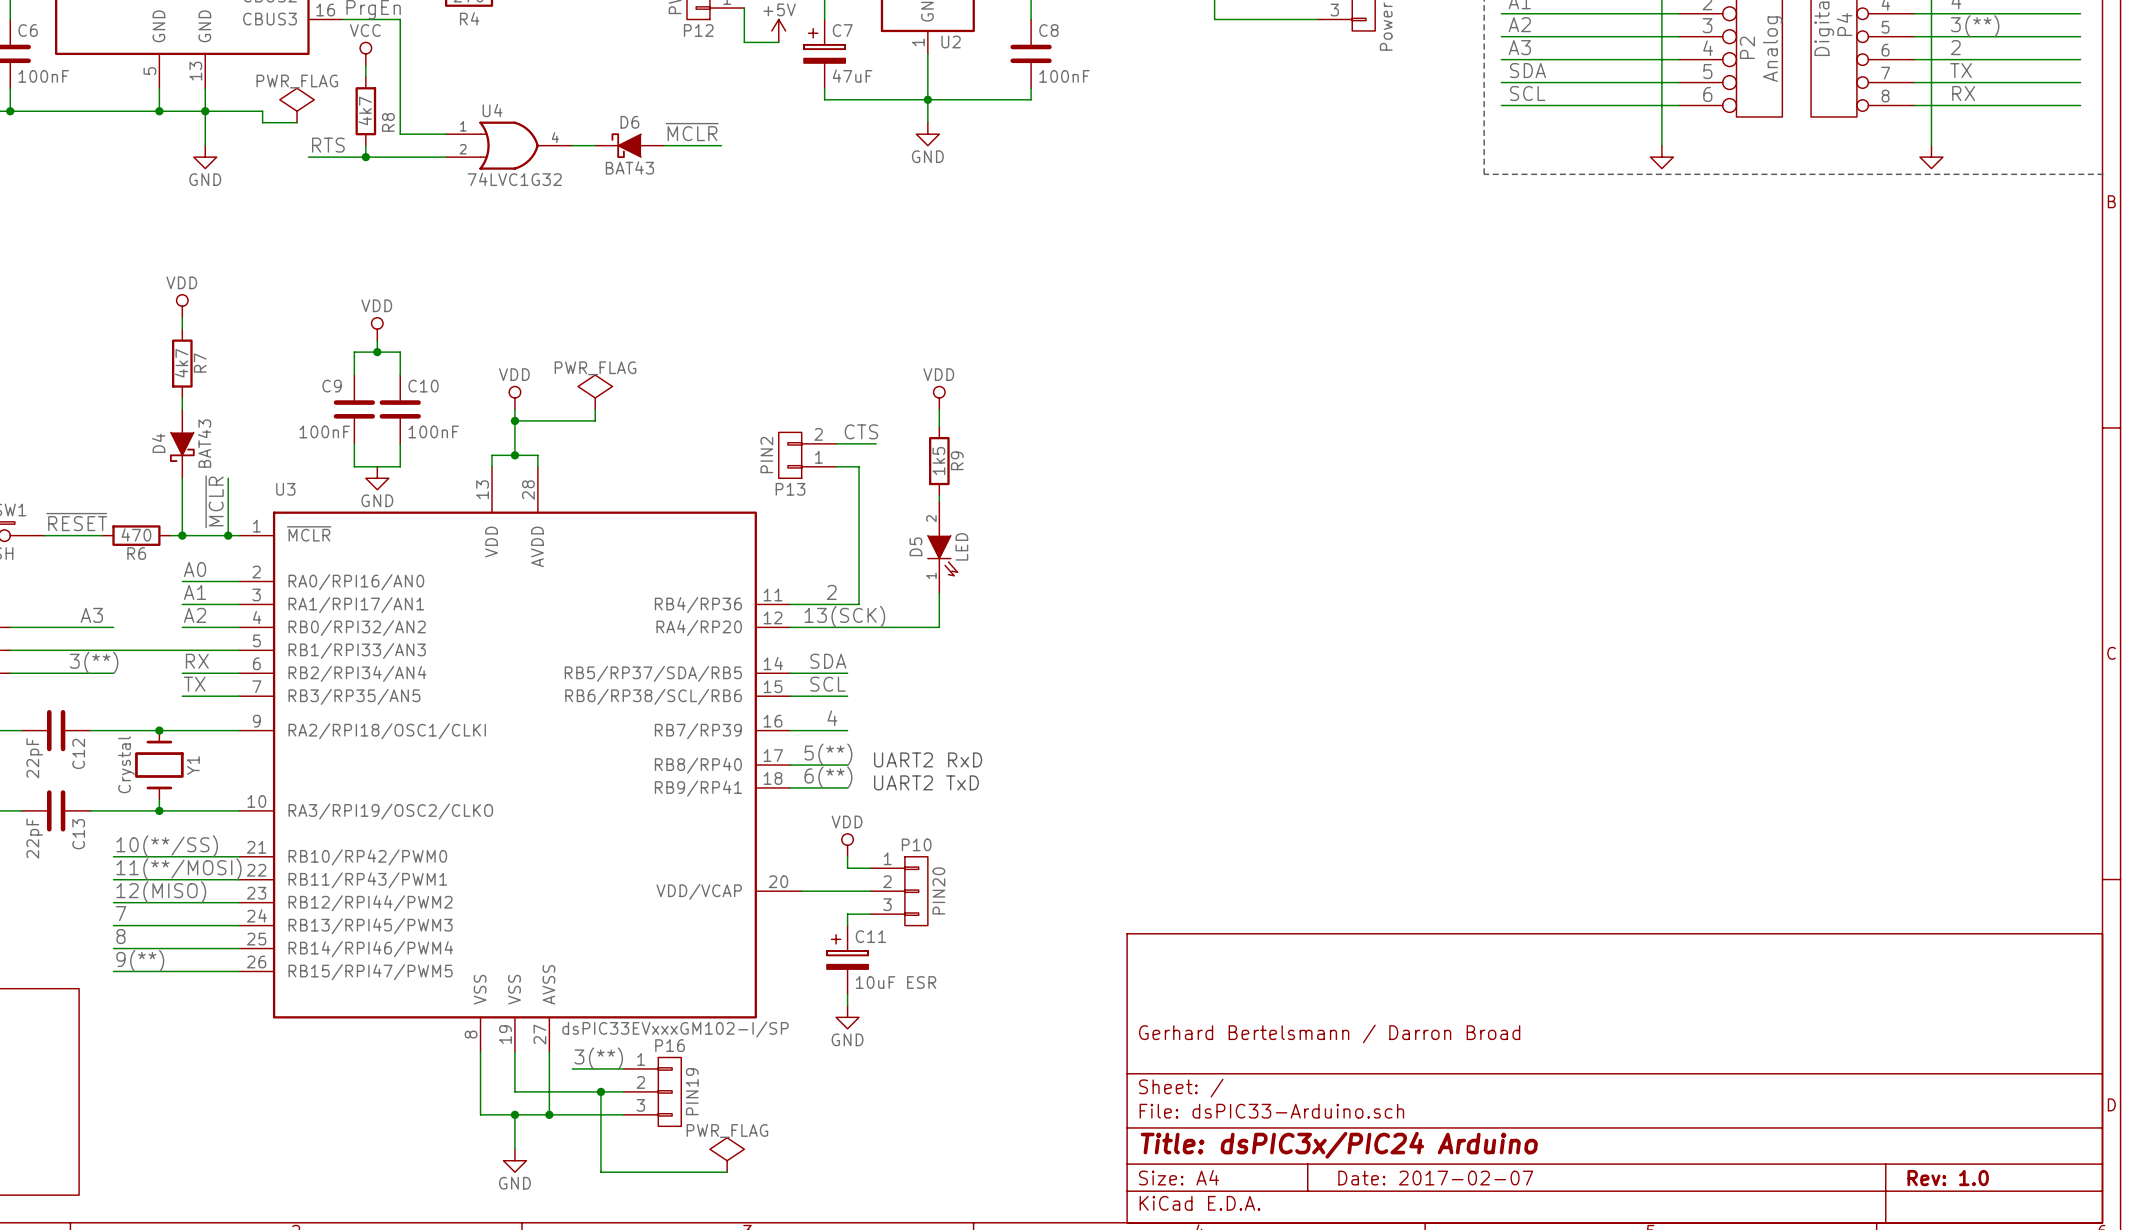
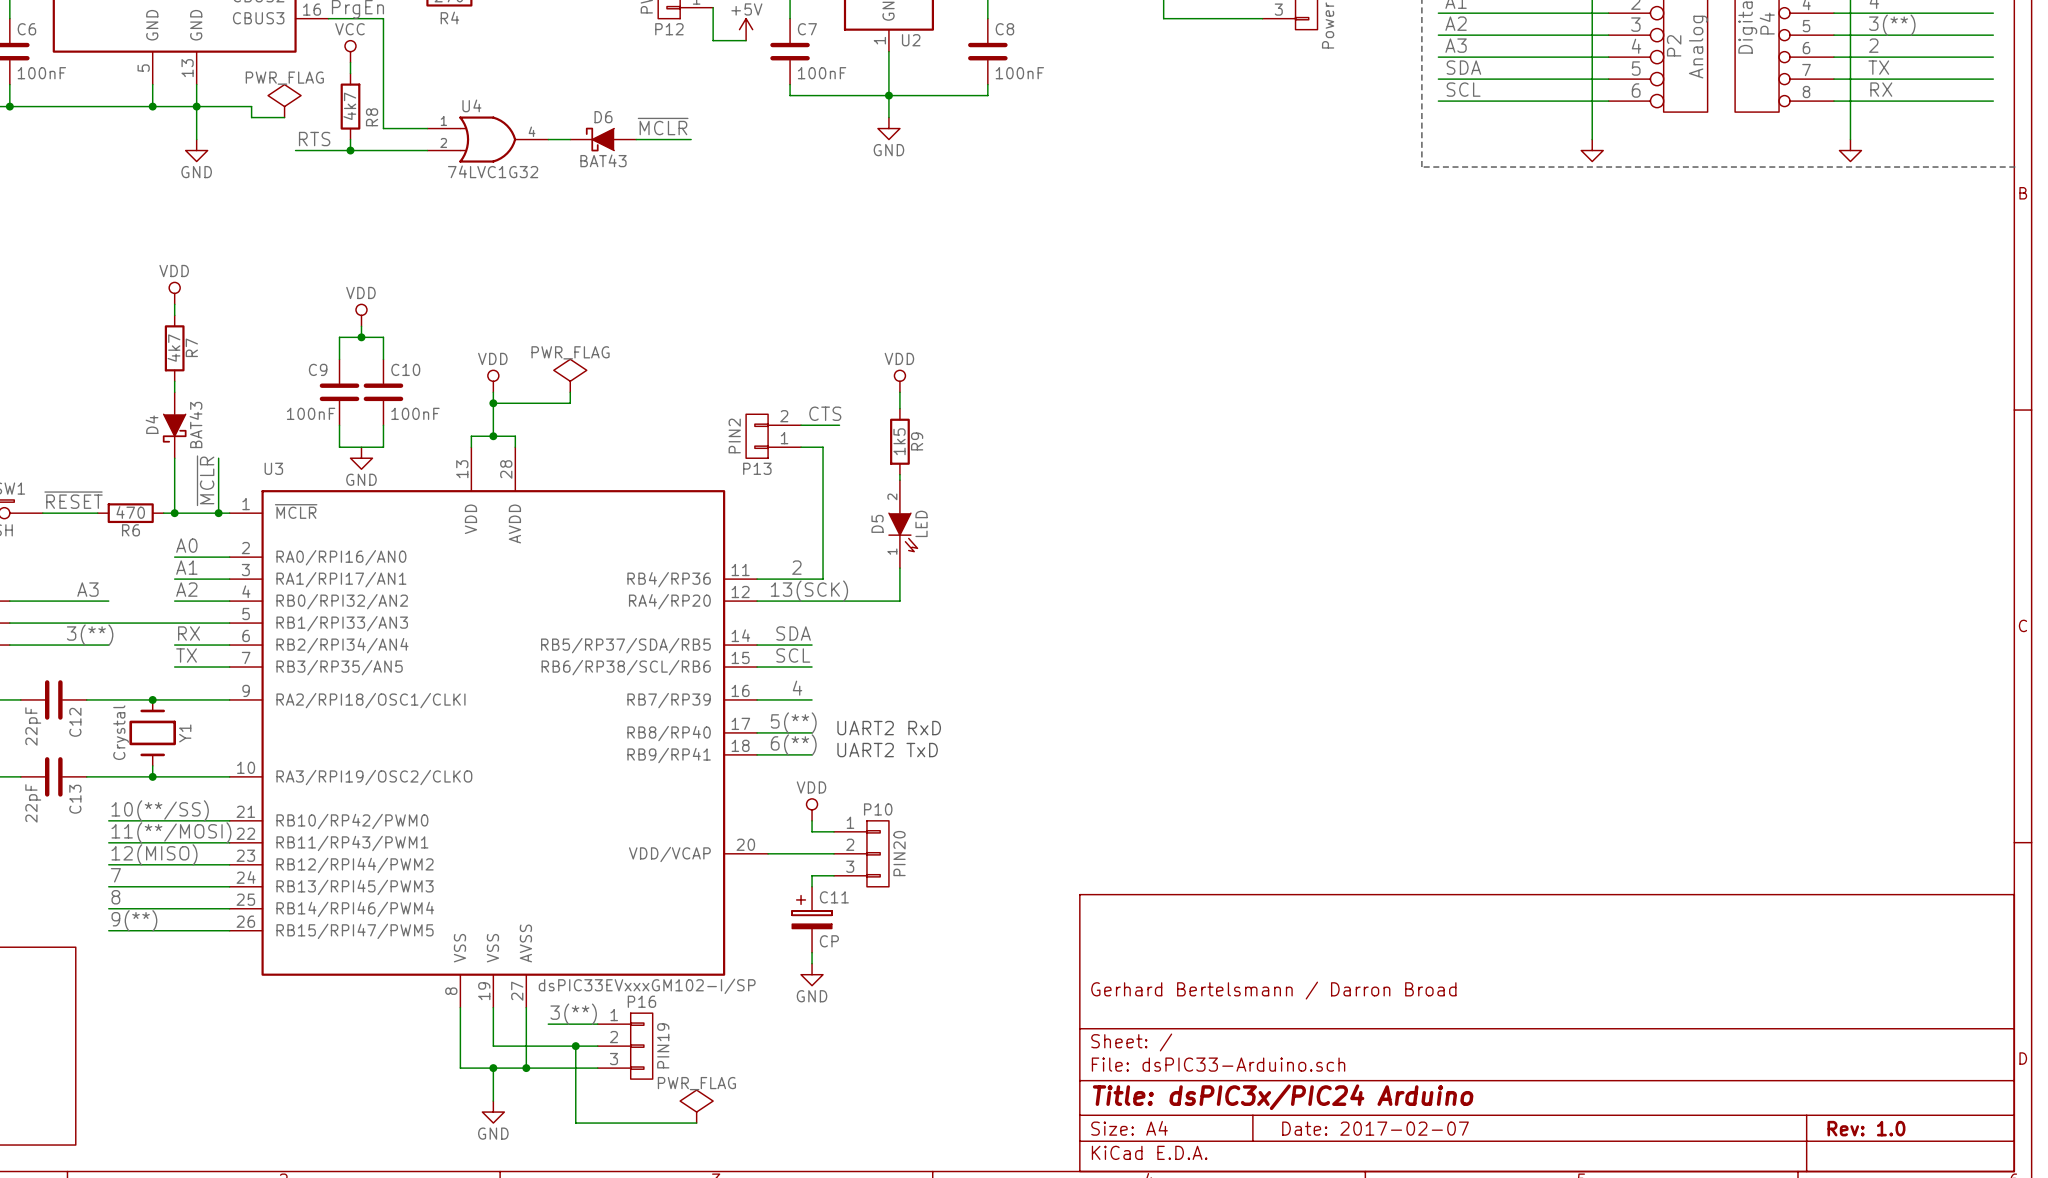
C7 symbol: [803, 19, 846, 89] -> [770, 18, 810, 85]
C7 value: 47uF (852, 76) -> 100nF (822, 73)
C11 value: 10uF ESR (895, 982) -> CP (829, 941)

